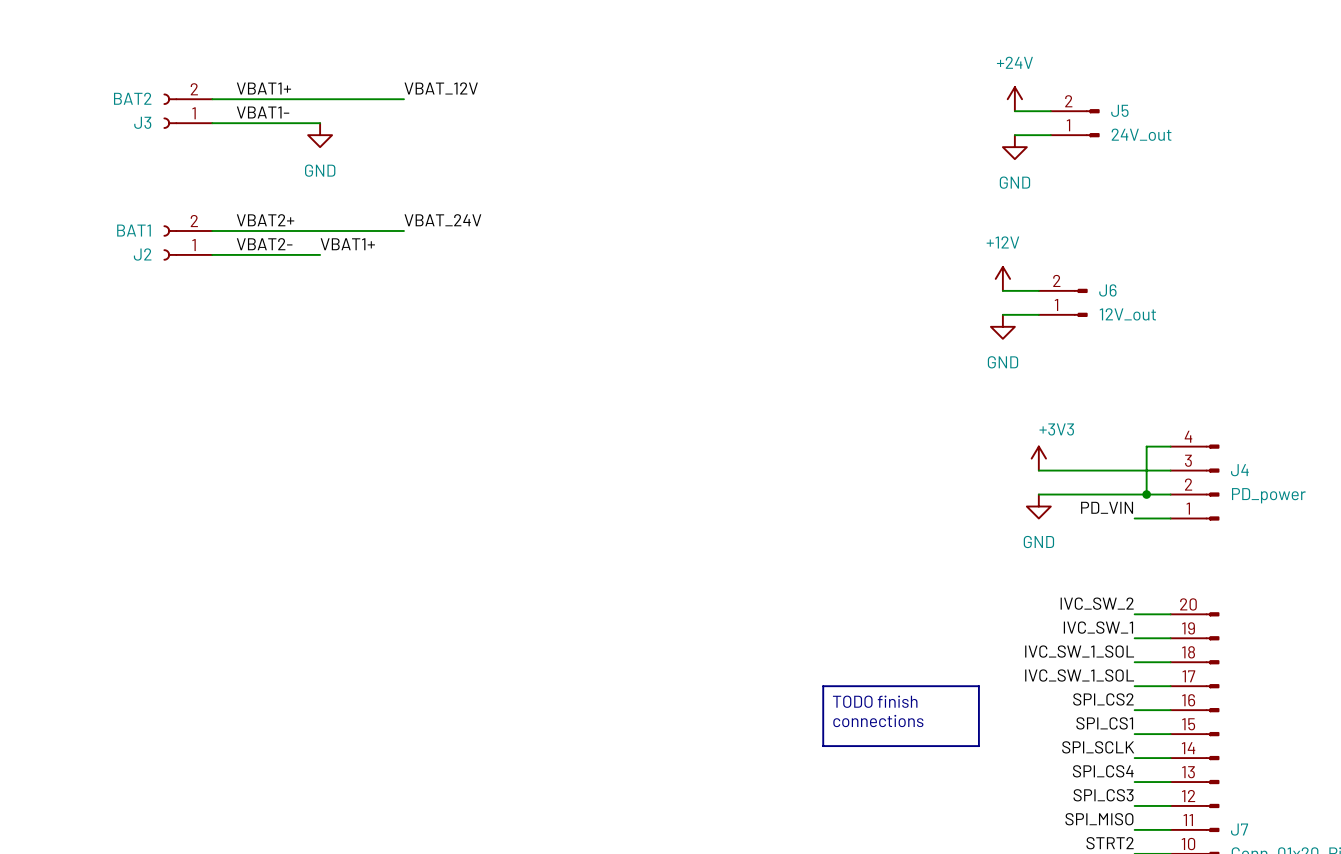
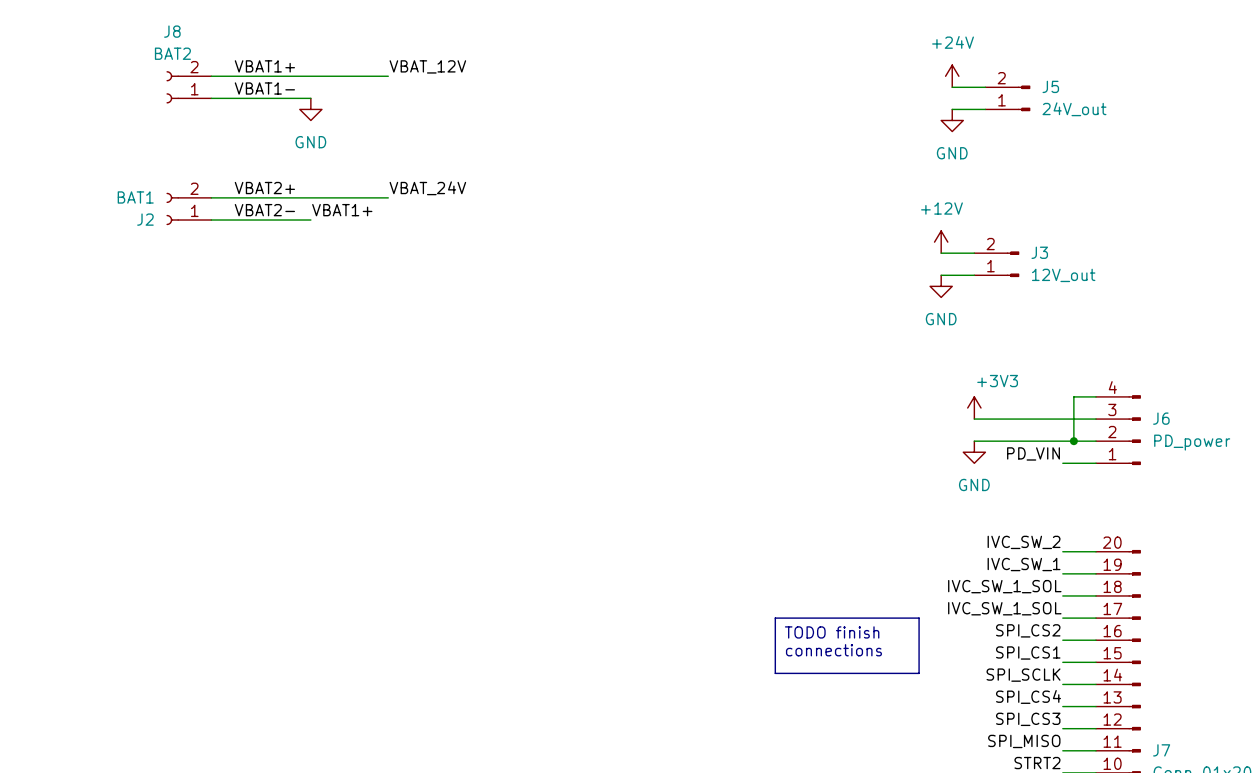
J3 value position: BAT2 (132, 98) -> BAT2 (172, 53)
J3 name: J3 (142, 122) -> J8 (172, 31)
J6 name: J6 (1107, 290) -> J3 (1039, 252)
J4 name: J4 (1239, 470) -> J6 (1161, 418)

